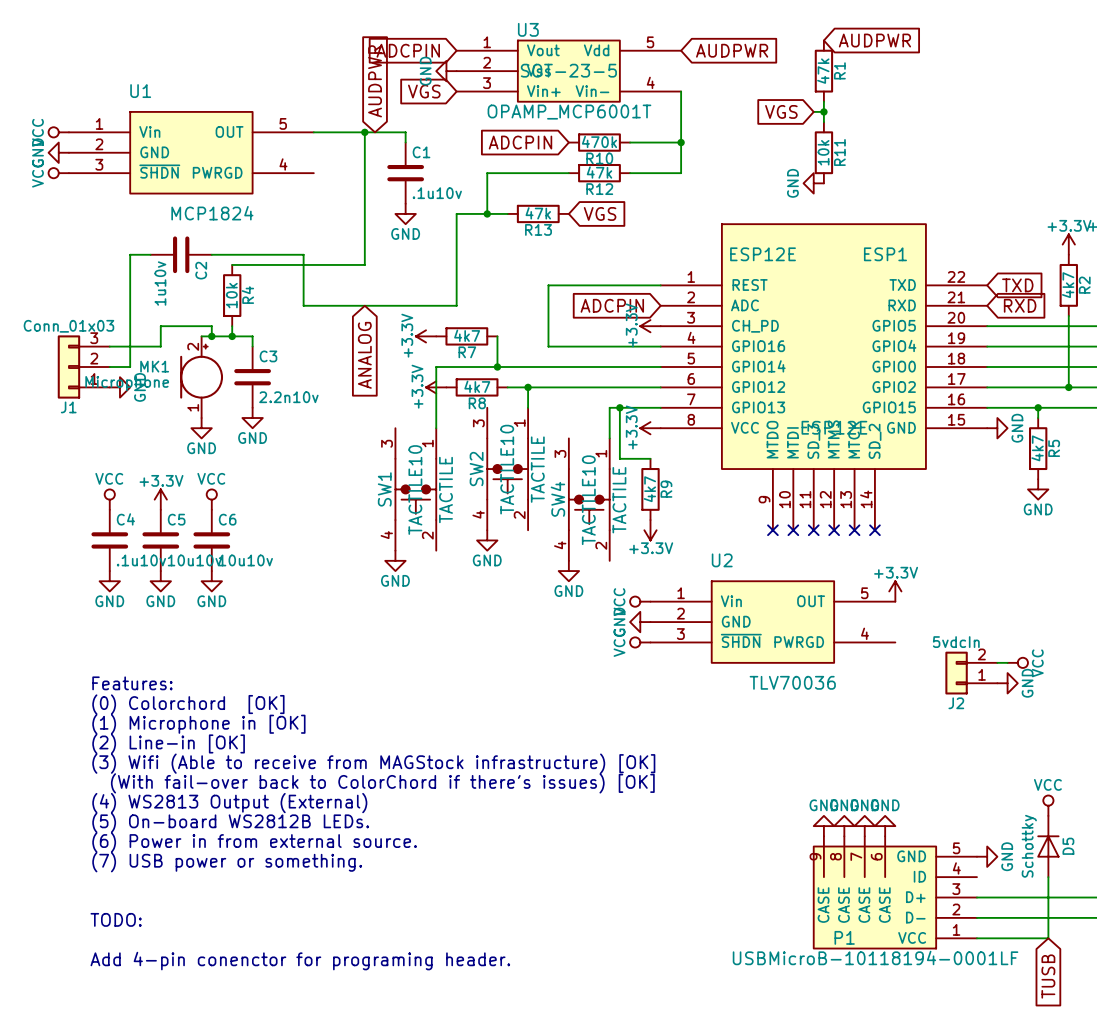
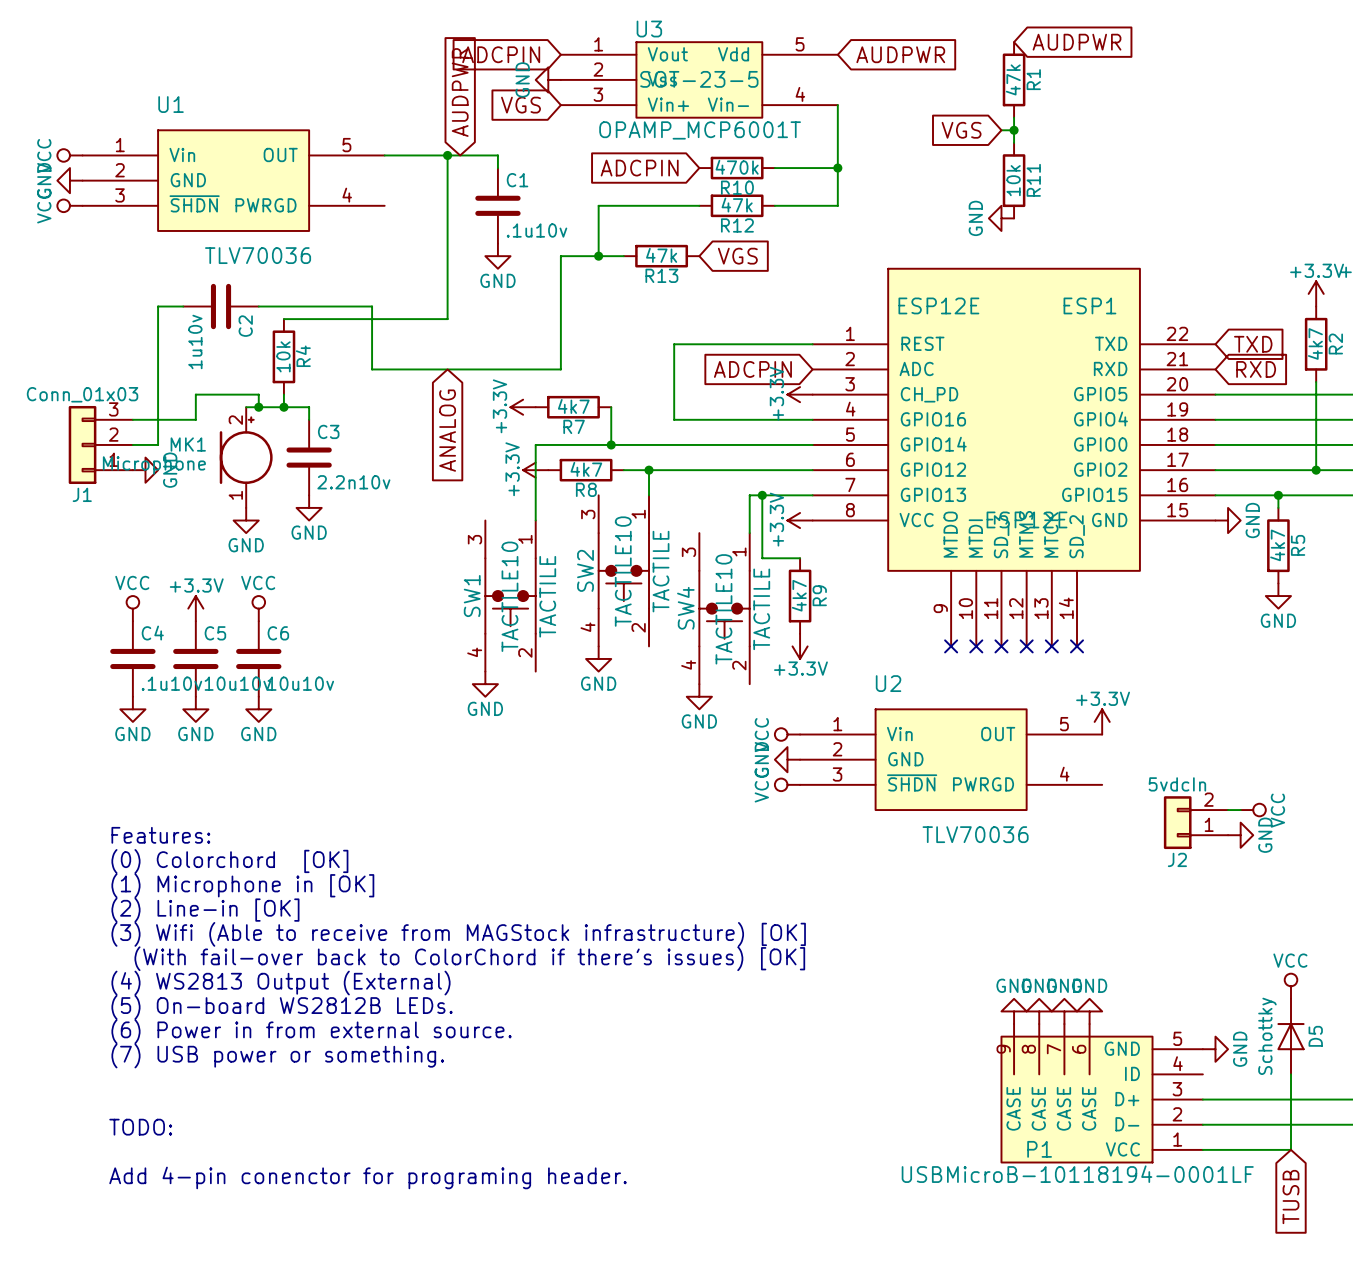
U1 value: MCP1824 (212, 213) -> TLV70036 (258, 255)

